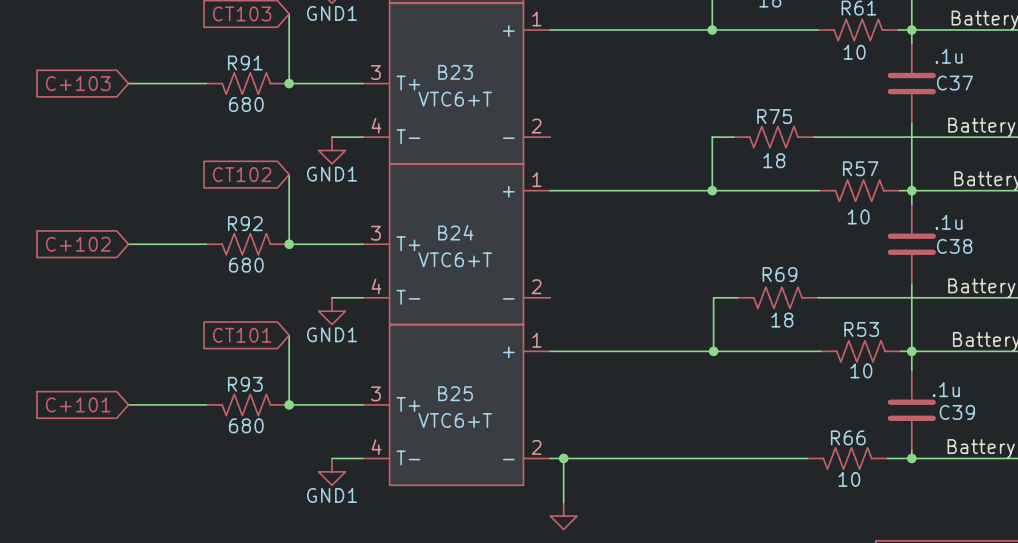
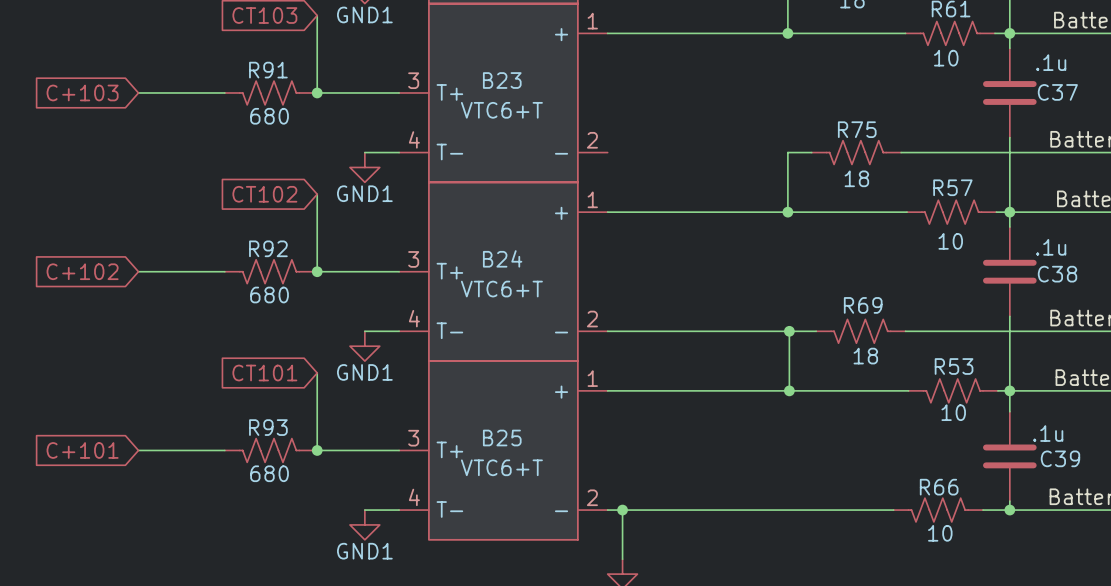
wire: none -> (607, 331) (789, 331)
junction: none -> (789, 331)

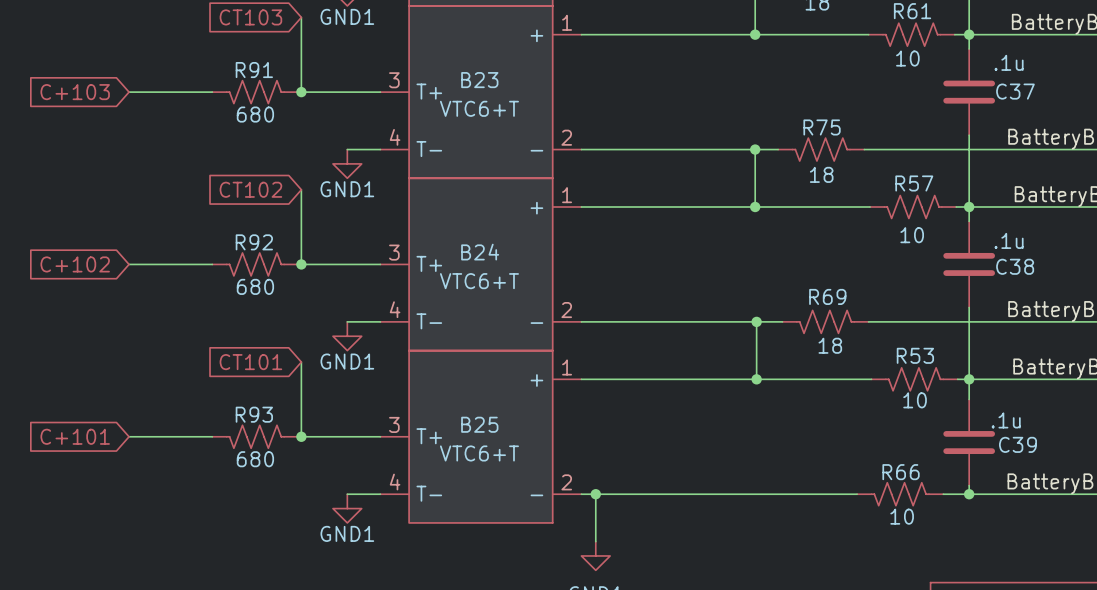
wire: none -> (581, 149) (755, 149)
junction: none -> (755, 149)

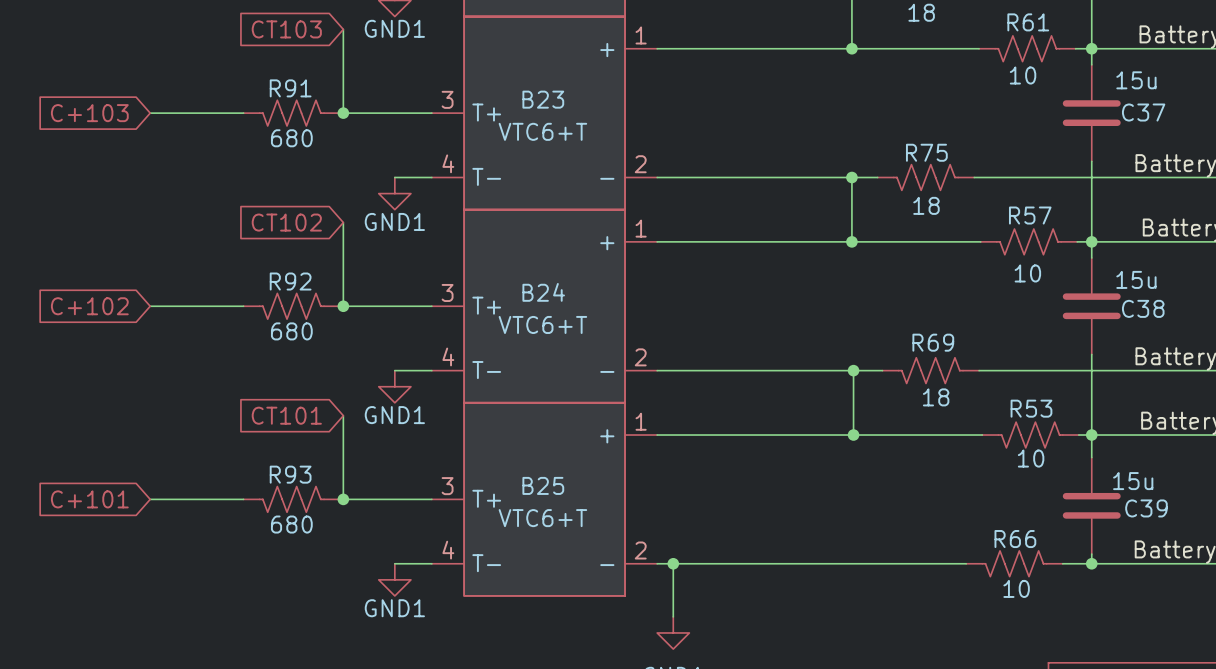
C37 value: .1u (1009, 62) -> 15u (1136, 80)
C38 value: .1u (1009, 240) -> 15u (1136, 279)
C39 value: .1u (1006, 420) -> 15u (1133, 481)

